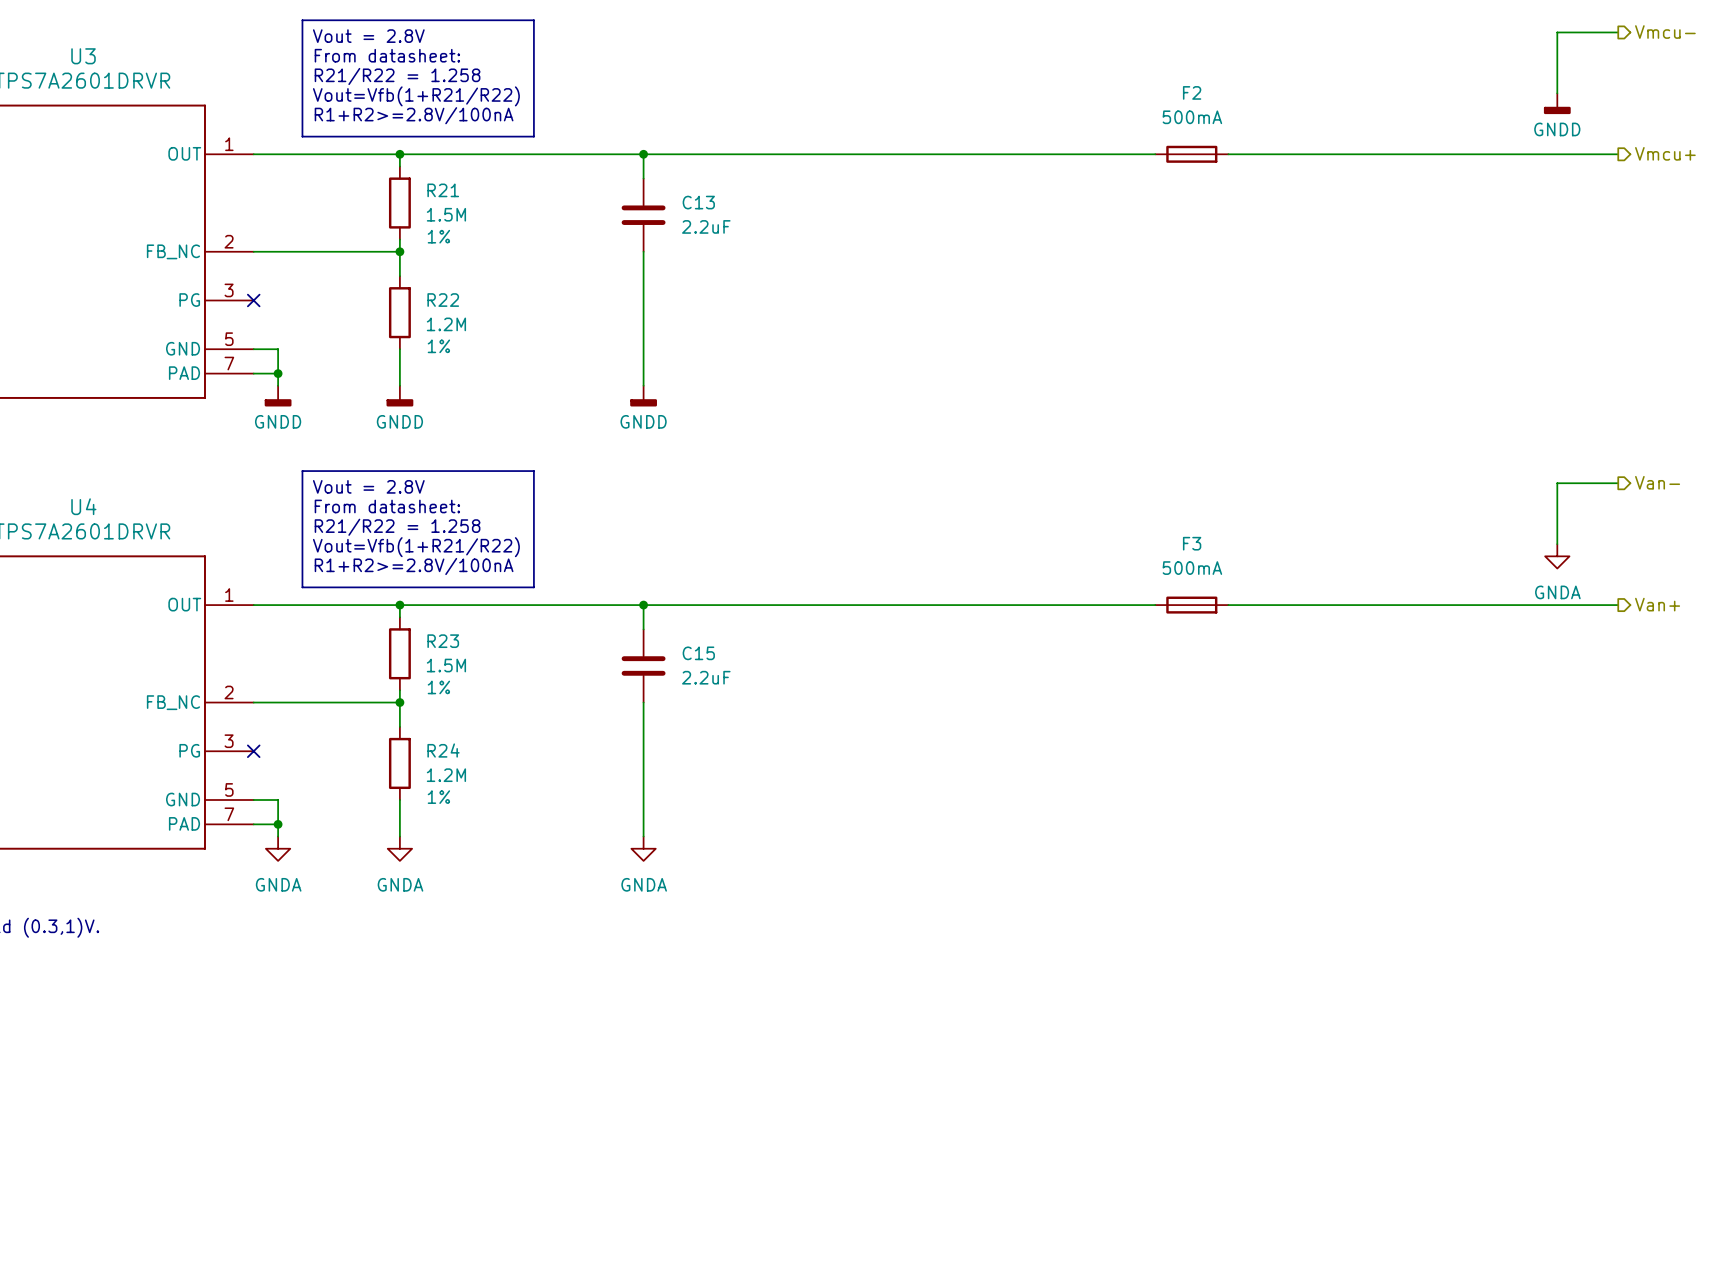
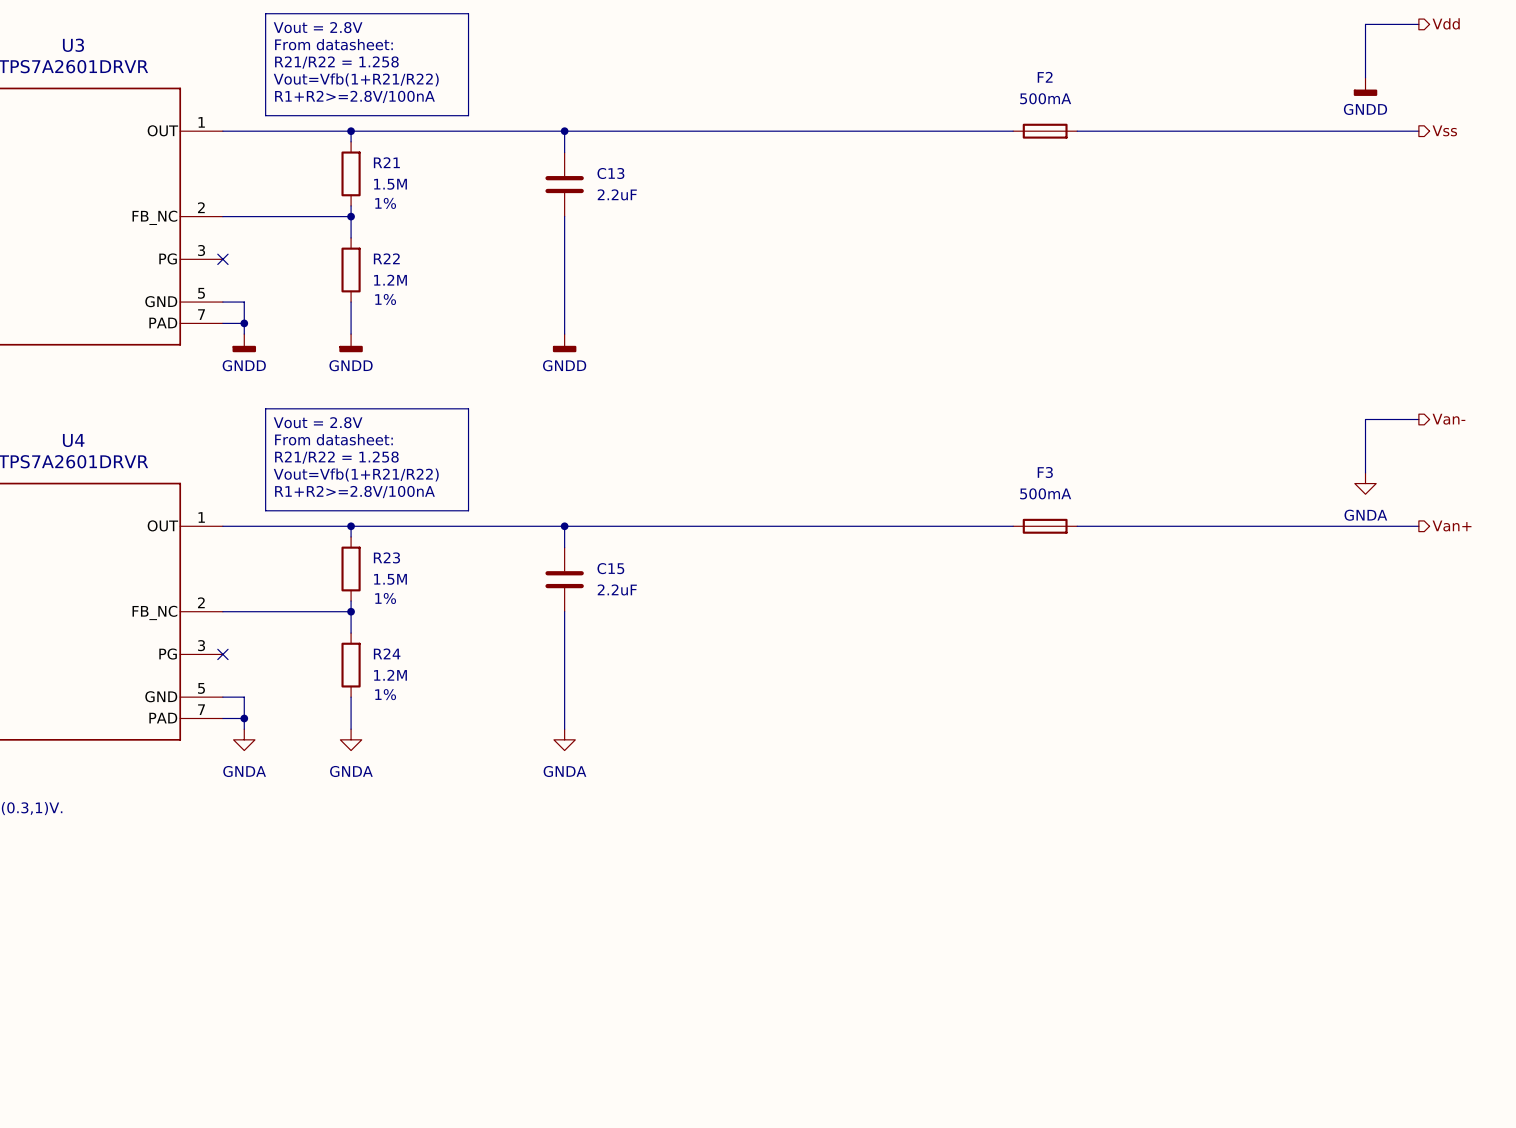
hierarchical label: Vmcu- (1665, 32) -> Vdd (1446, 23)
hierarchical label: Vmcu+ (1665, 153) -> Vss (1444, 130)

